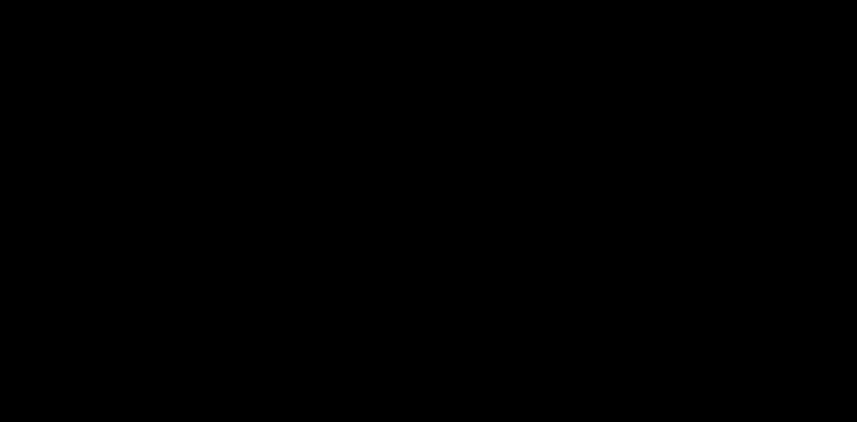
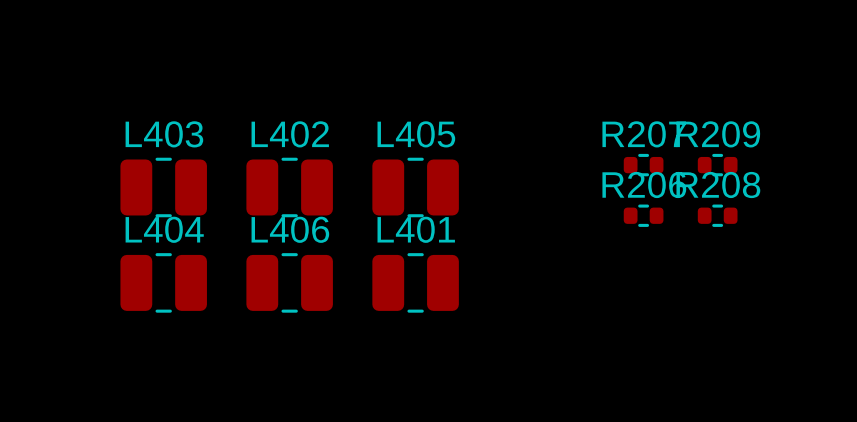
R207: none -> (643, 165)
R209: none -> (717, 165)
L403: none -> (163, 187)
L402: none -> (289, 187)
L405: none -> (415, 187)
R206: none -> (643, 215)
R208: none -> (717, 215)
L404: none -> (163, 282)
L406: none -> (289, 282)
L401: none -> (415, 282)

